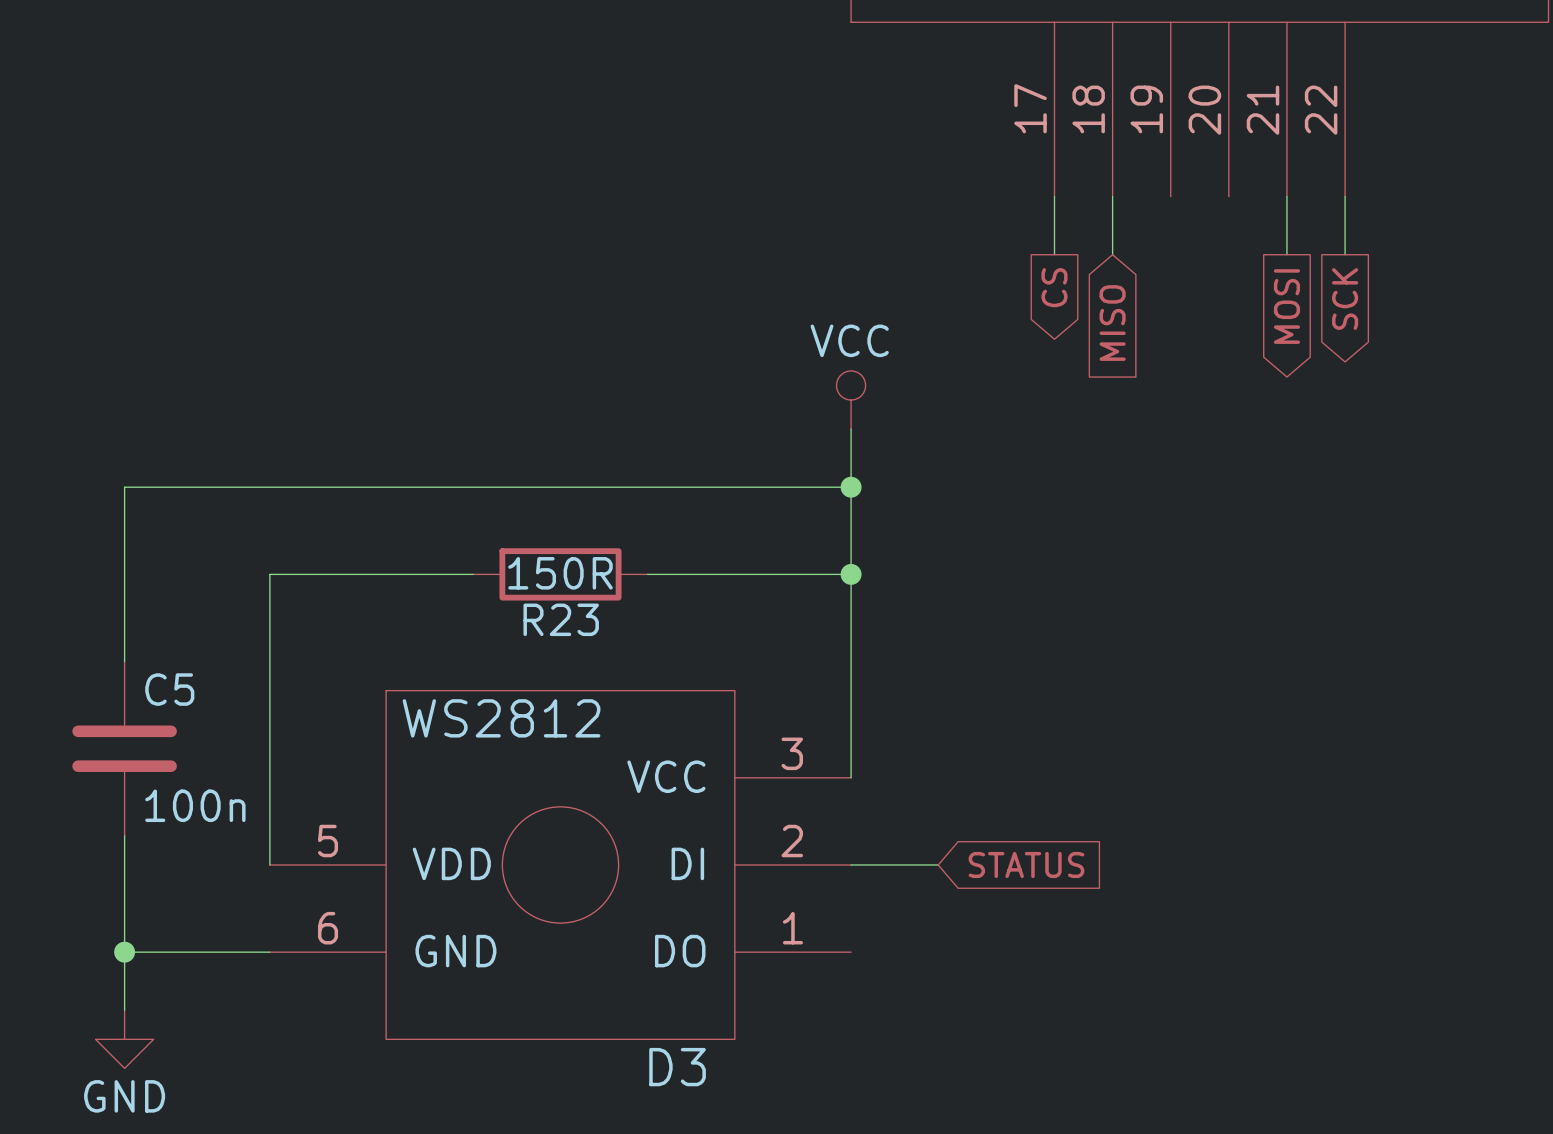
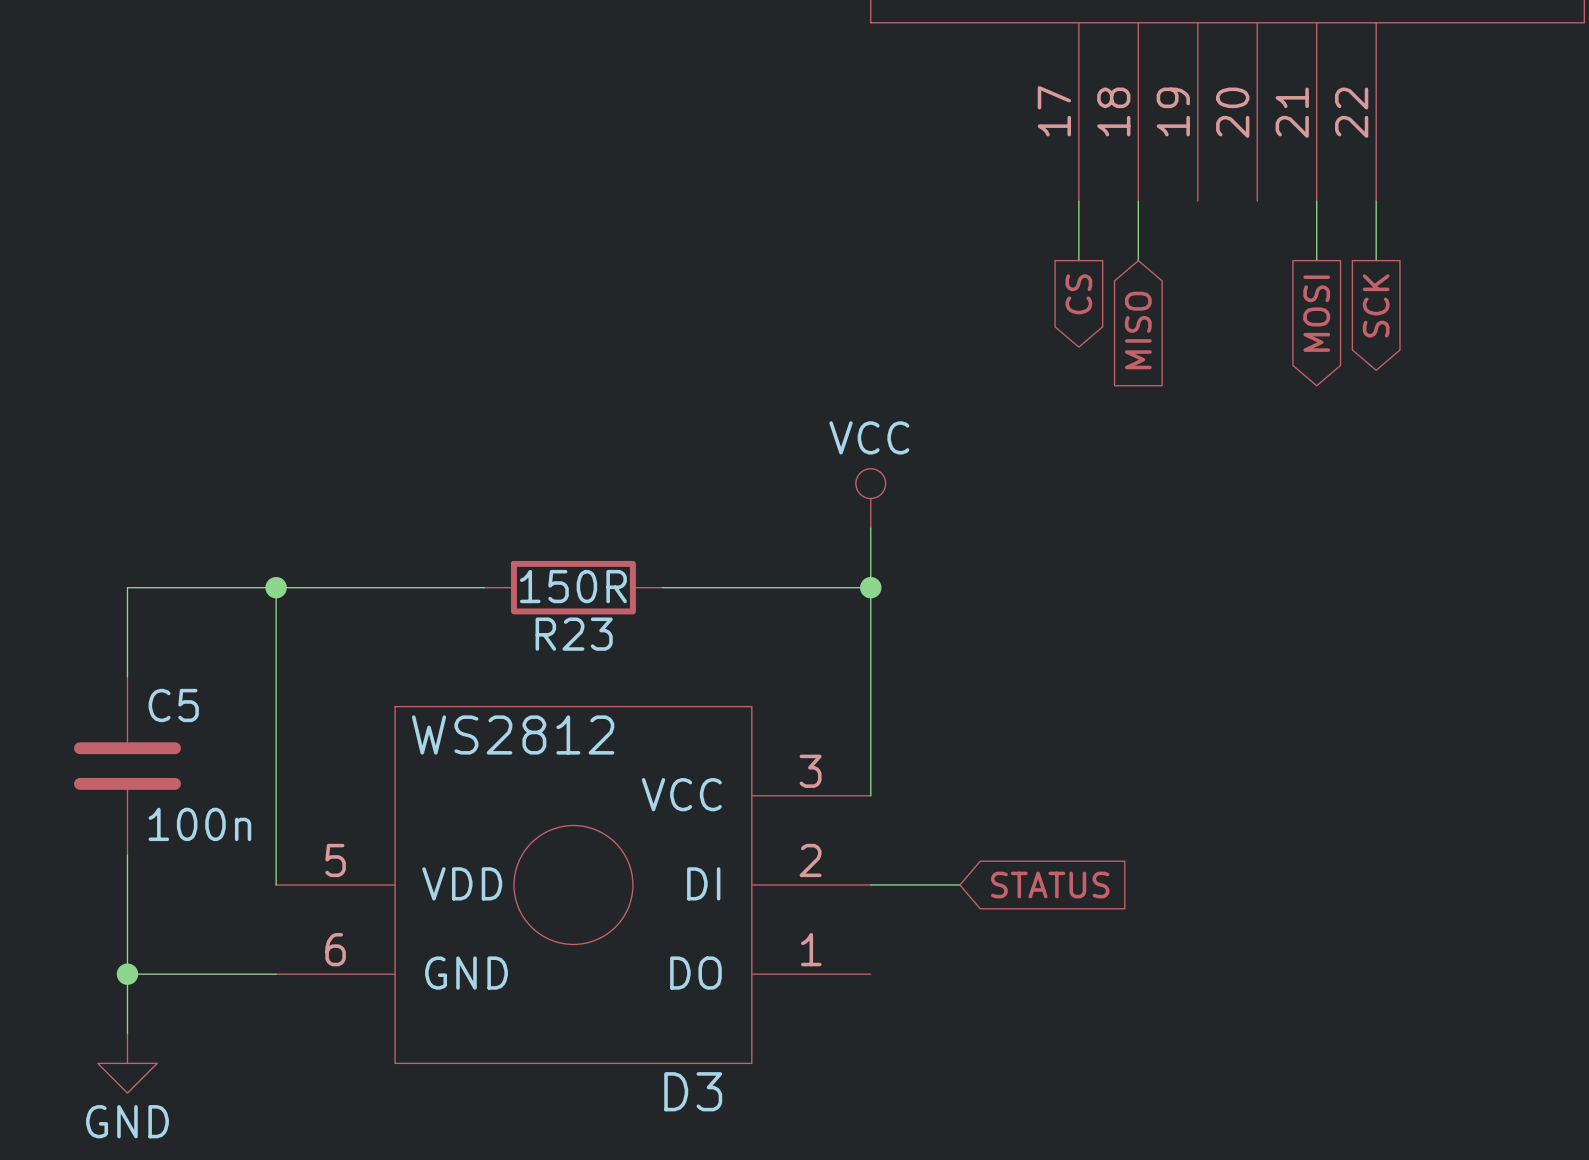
power symbol position: VCC (851, 400) -> VCC (870, 498)
wire: (851, 429) (851, 516) -> none
wire: (851, 487) (124, 487) (124, 574) -> (276, 587) (127, 587)
junction: (851, 487) -> none
junction: none -> (276, 587)

